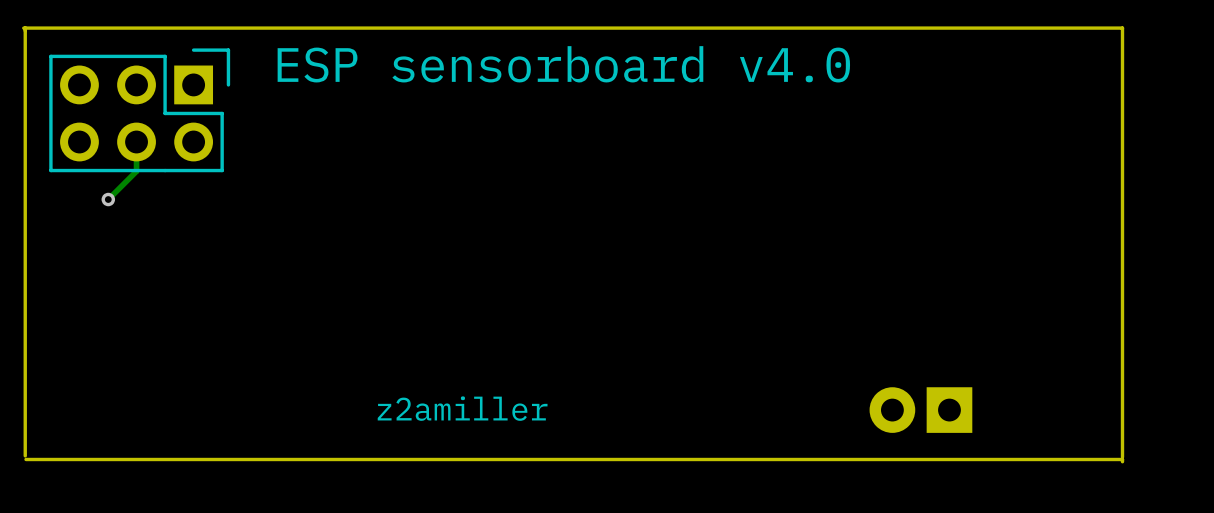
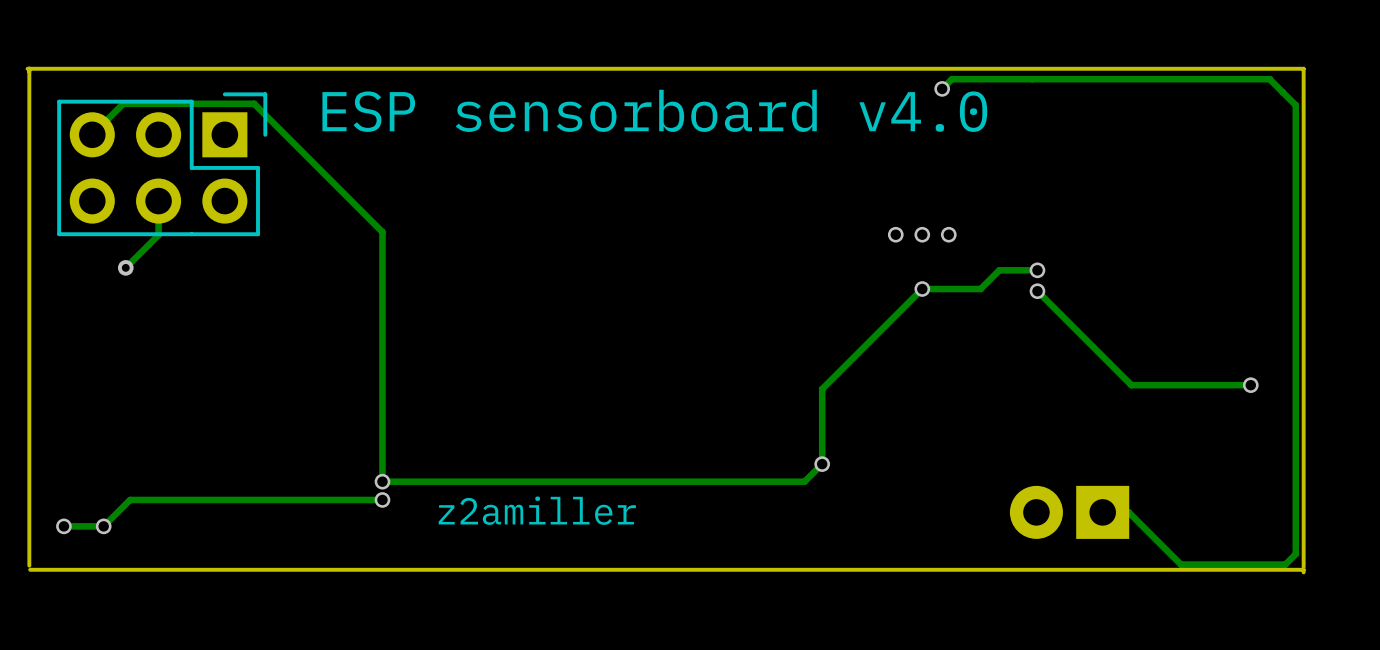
track: none -> (942, 88) (951, 79) (1269, 79) (1295, 105) (1295, 554) (1285, 564) (1180, 564) (1128, 512) (1102, 512)
via: none -> (942, 88)
track: none -> (92, 134) (123, 103) (254, 103) (382, 232) (382, 481) (804, 481) (822, 463)
via: none -> (895, 234)
via: none -> (922, 234)
via: none -> (948, 234)
track: none -> (1037, 270) (999, 270) (980, 289) (922, 289)
via: none -> (1037, 270)
track: none -> (922, 289) (822, 389) (822, 464)
via: none -> (922, 289)
track: none -> (1037, 291) (1131, 385) (1251, 384)
via: none -> (1037, 291)
via: none -> (1250, 385)
via: none -> (822, 464)
via: none -> (382, 481)
track: none -> (382, 499) (130, 499) (103, 526) (63, 526)
via: none -> (382, 499)
via: none -> (63, 526)
via: none -> (103, 526)

